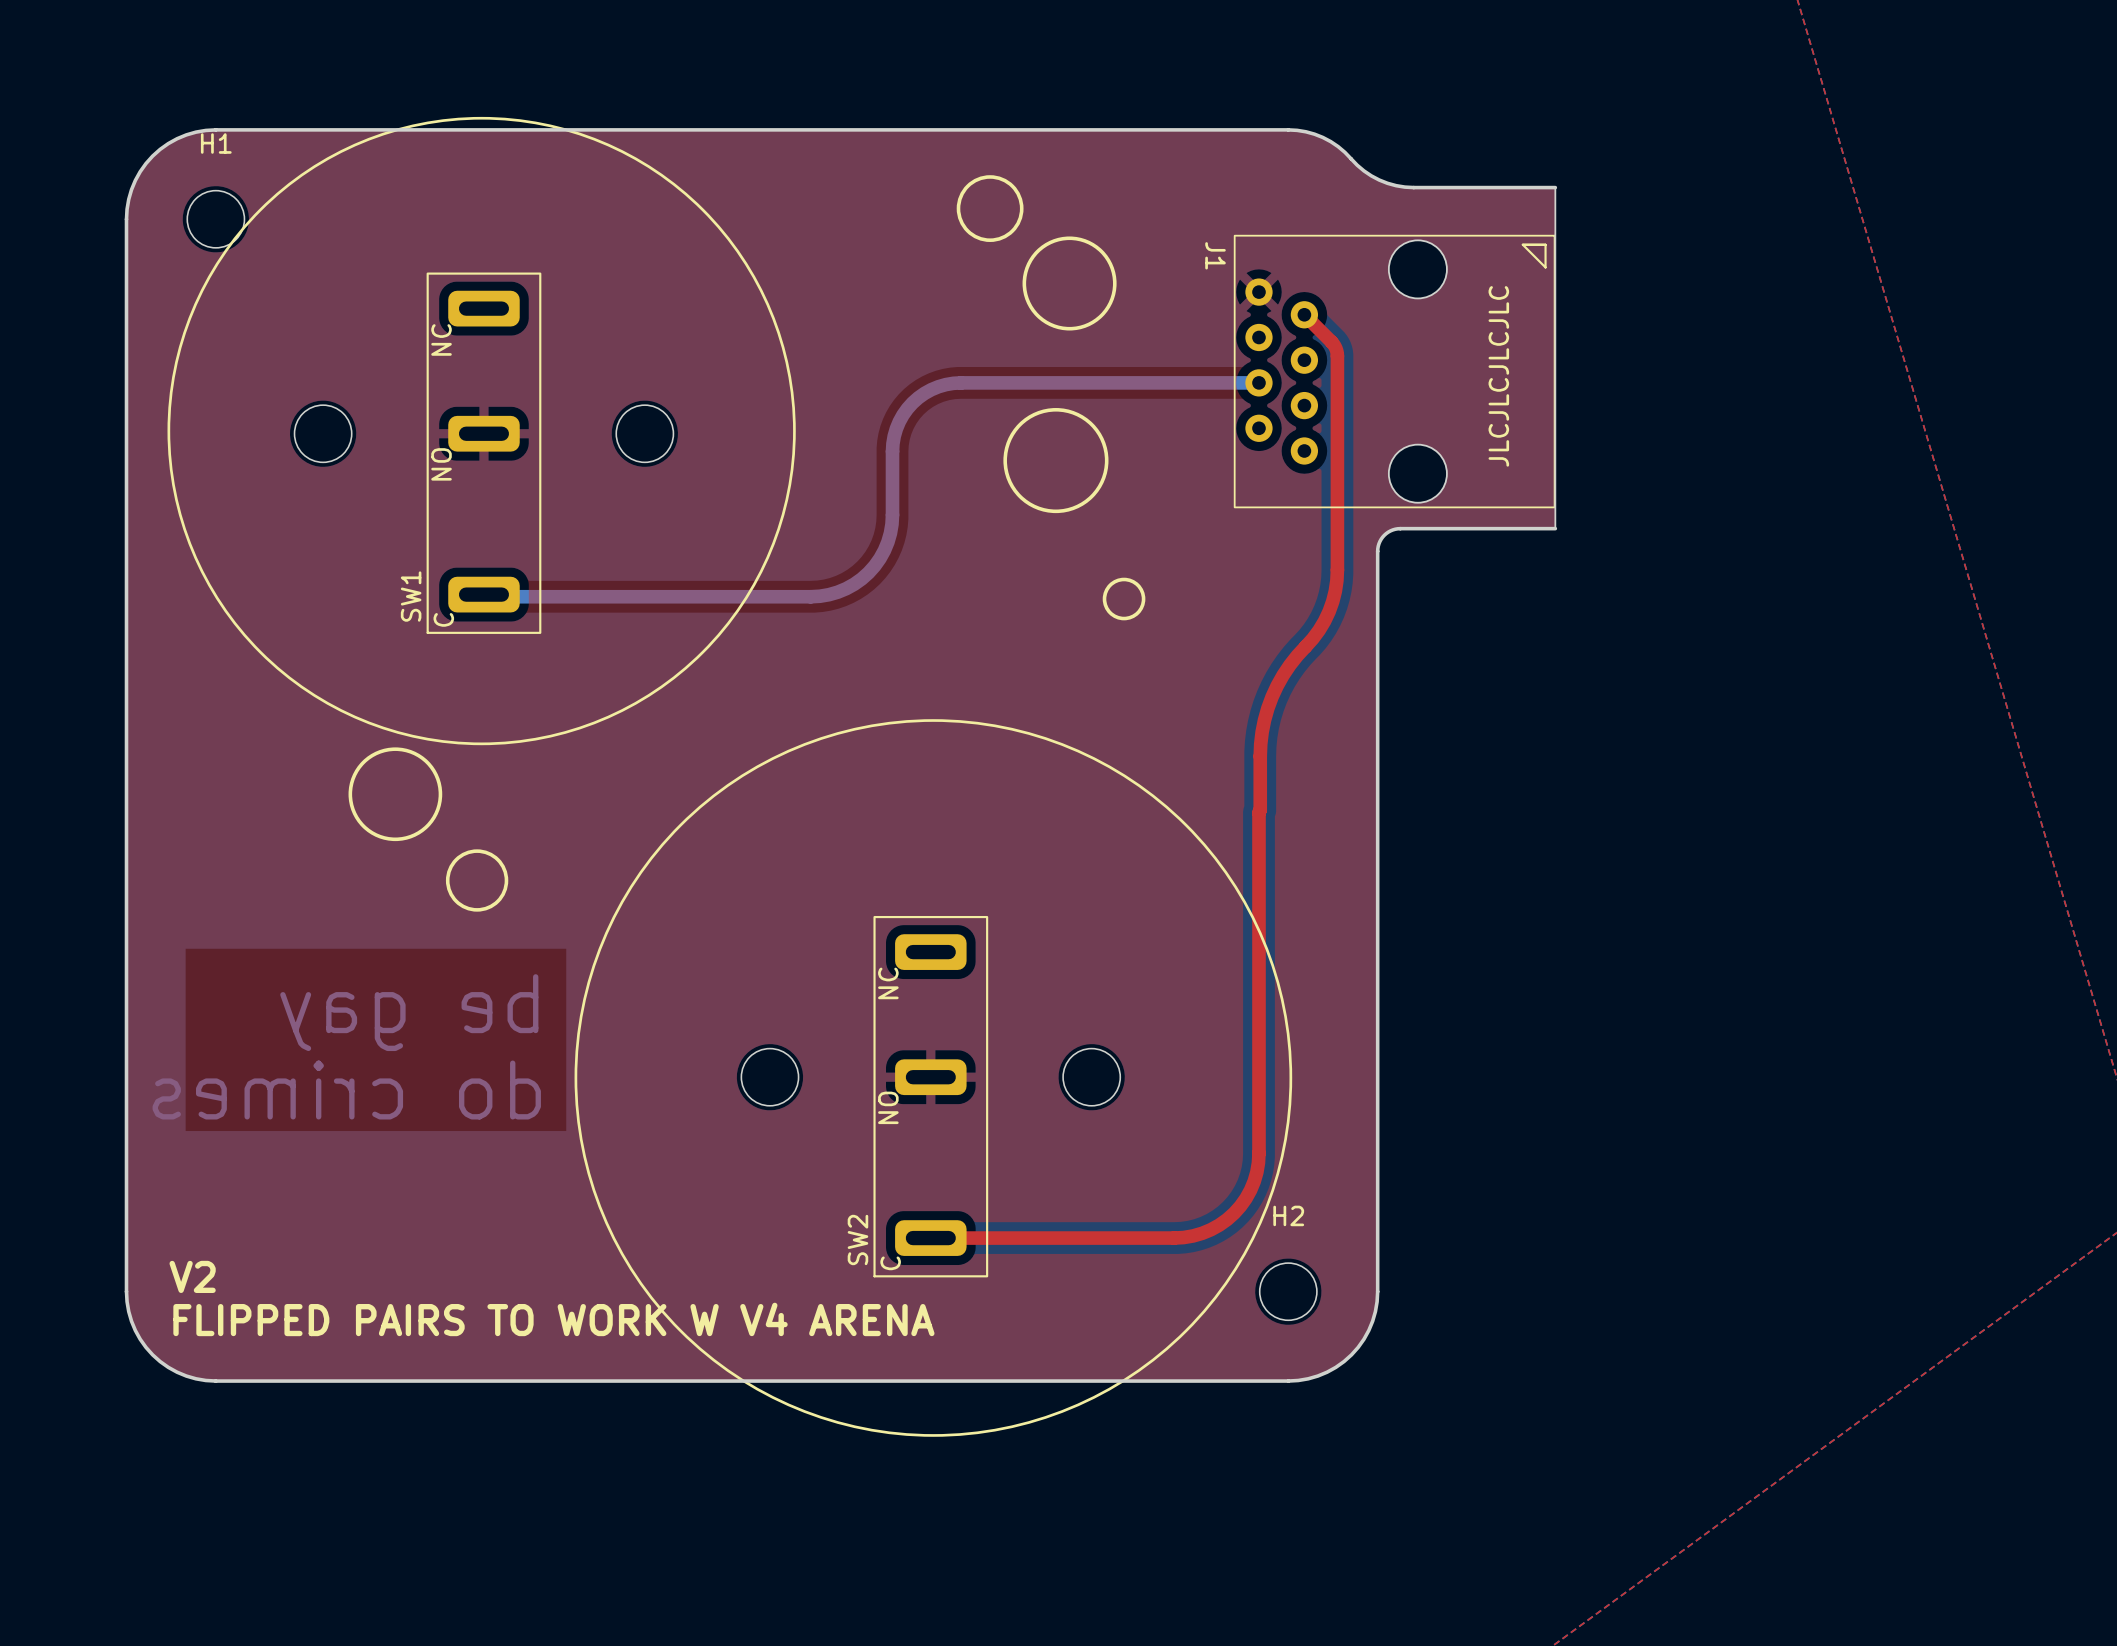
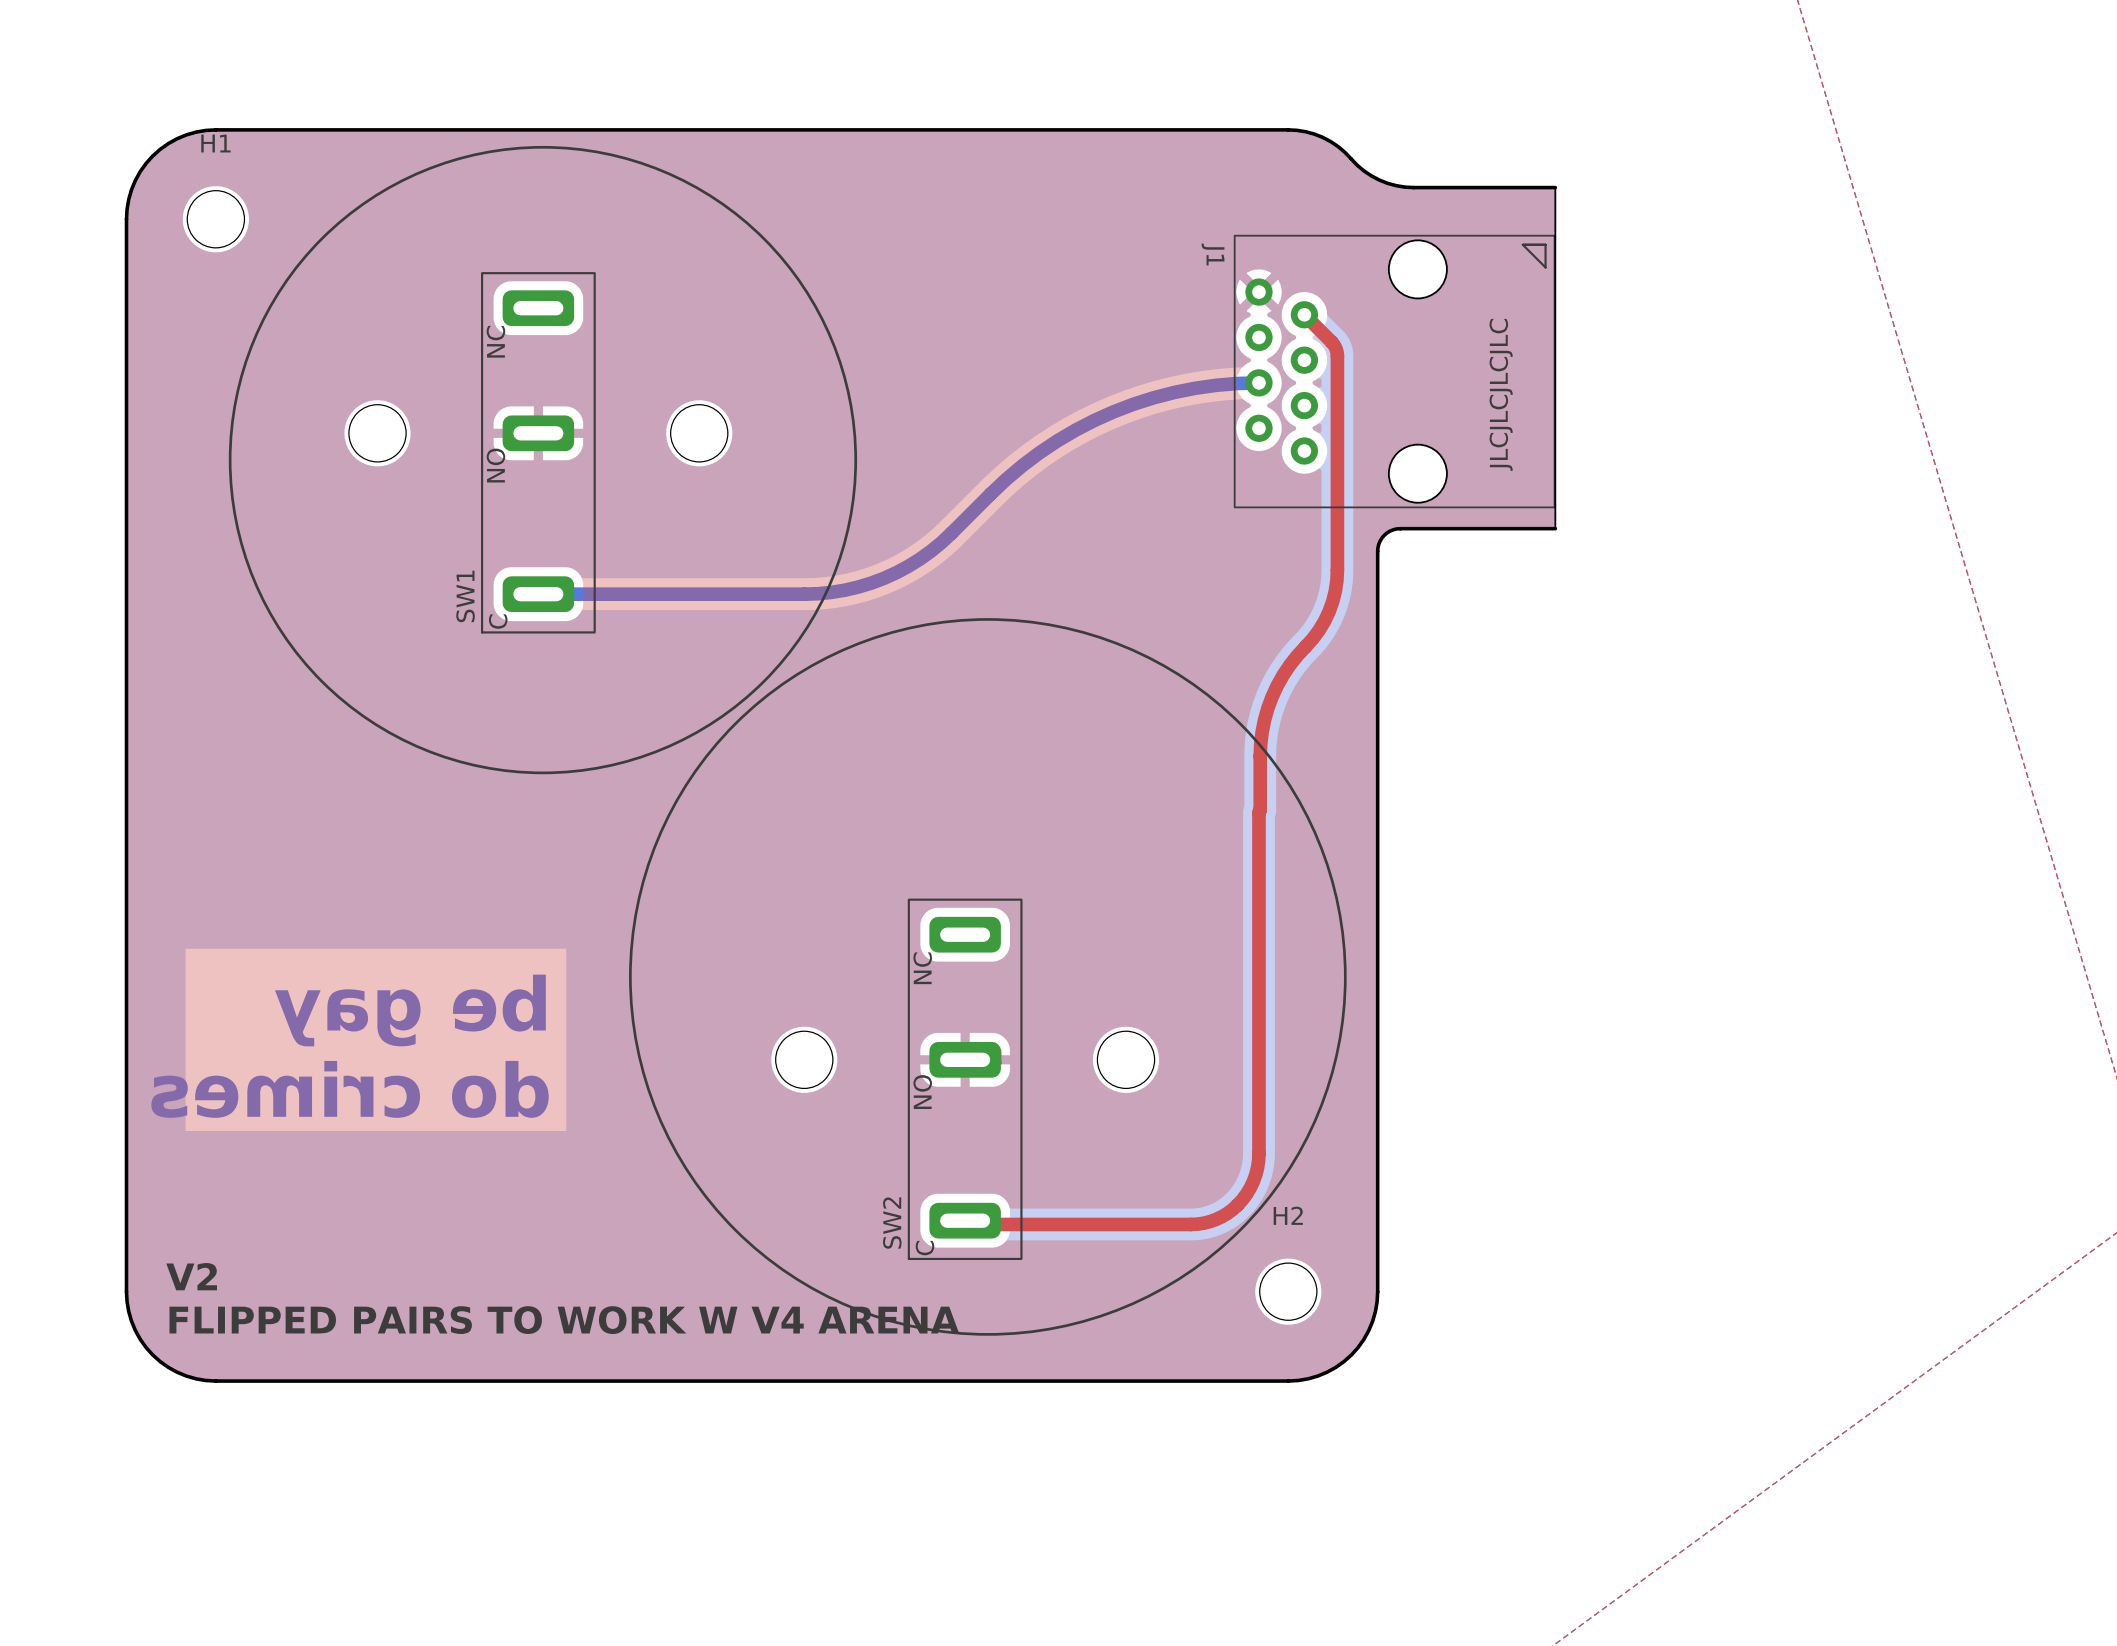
drawing: [956, 175, 1117, 331] -> none
bottom track: (1258, 382) (961, 382) (945, 384) (931, 389) (918, 397) (907, 408) (896, 428) (892, 451) (891, 524) (884, 550) (874, 565) (861, 578) (846, 588) (828, 594) (810, 596) (486, 596) (483, 594) -> (1258, 382) (1216, 385) (1174, 392) (1133, 404) (1094, 420) (1057, 441) (1022, 465) (941, 542) (919, 559) (883, 578) (858, 587) (831, 592) (804, 594) (538, 594)
drawing: [1003, 408, 1109, 514] -> none
drawing position: (481, 431) -> (542, 460)
SW1 position: (483, 453) -> (538, 452)
drawing: [1102, 577, 1146, 621] -> none
drawing: [348, 747, 509, 912] -> none
drawing position: (933, 1077) -> (987, 976)
SW2 position: (930, 1096) -> (965, 1079)
top track: (1258, 1153) (1254, 1181) (1240, 1206) (1219, 1225) (1193, 1235) (1174, 1238) (930, 1238) -> (1258, 1153) (1255, 1174) (1246, 1194) (1232, 1209) (1209, 1221) (1190, 1224) (999, 1224)

